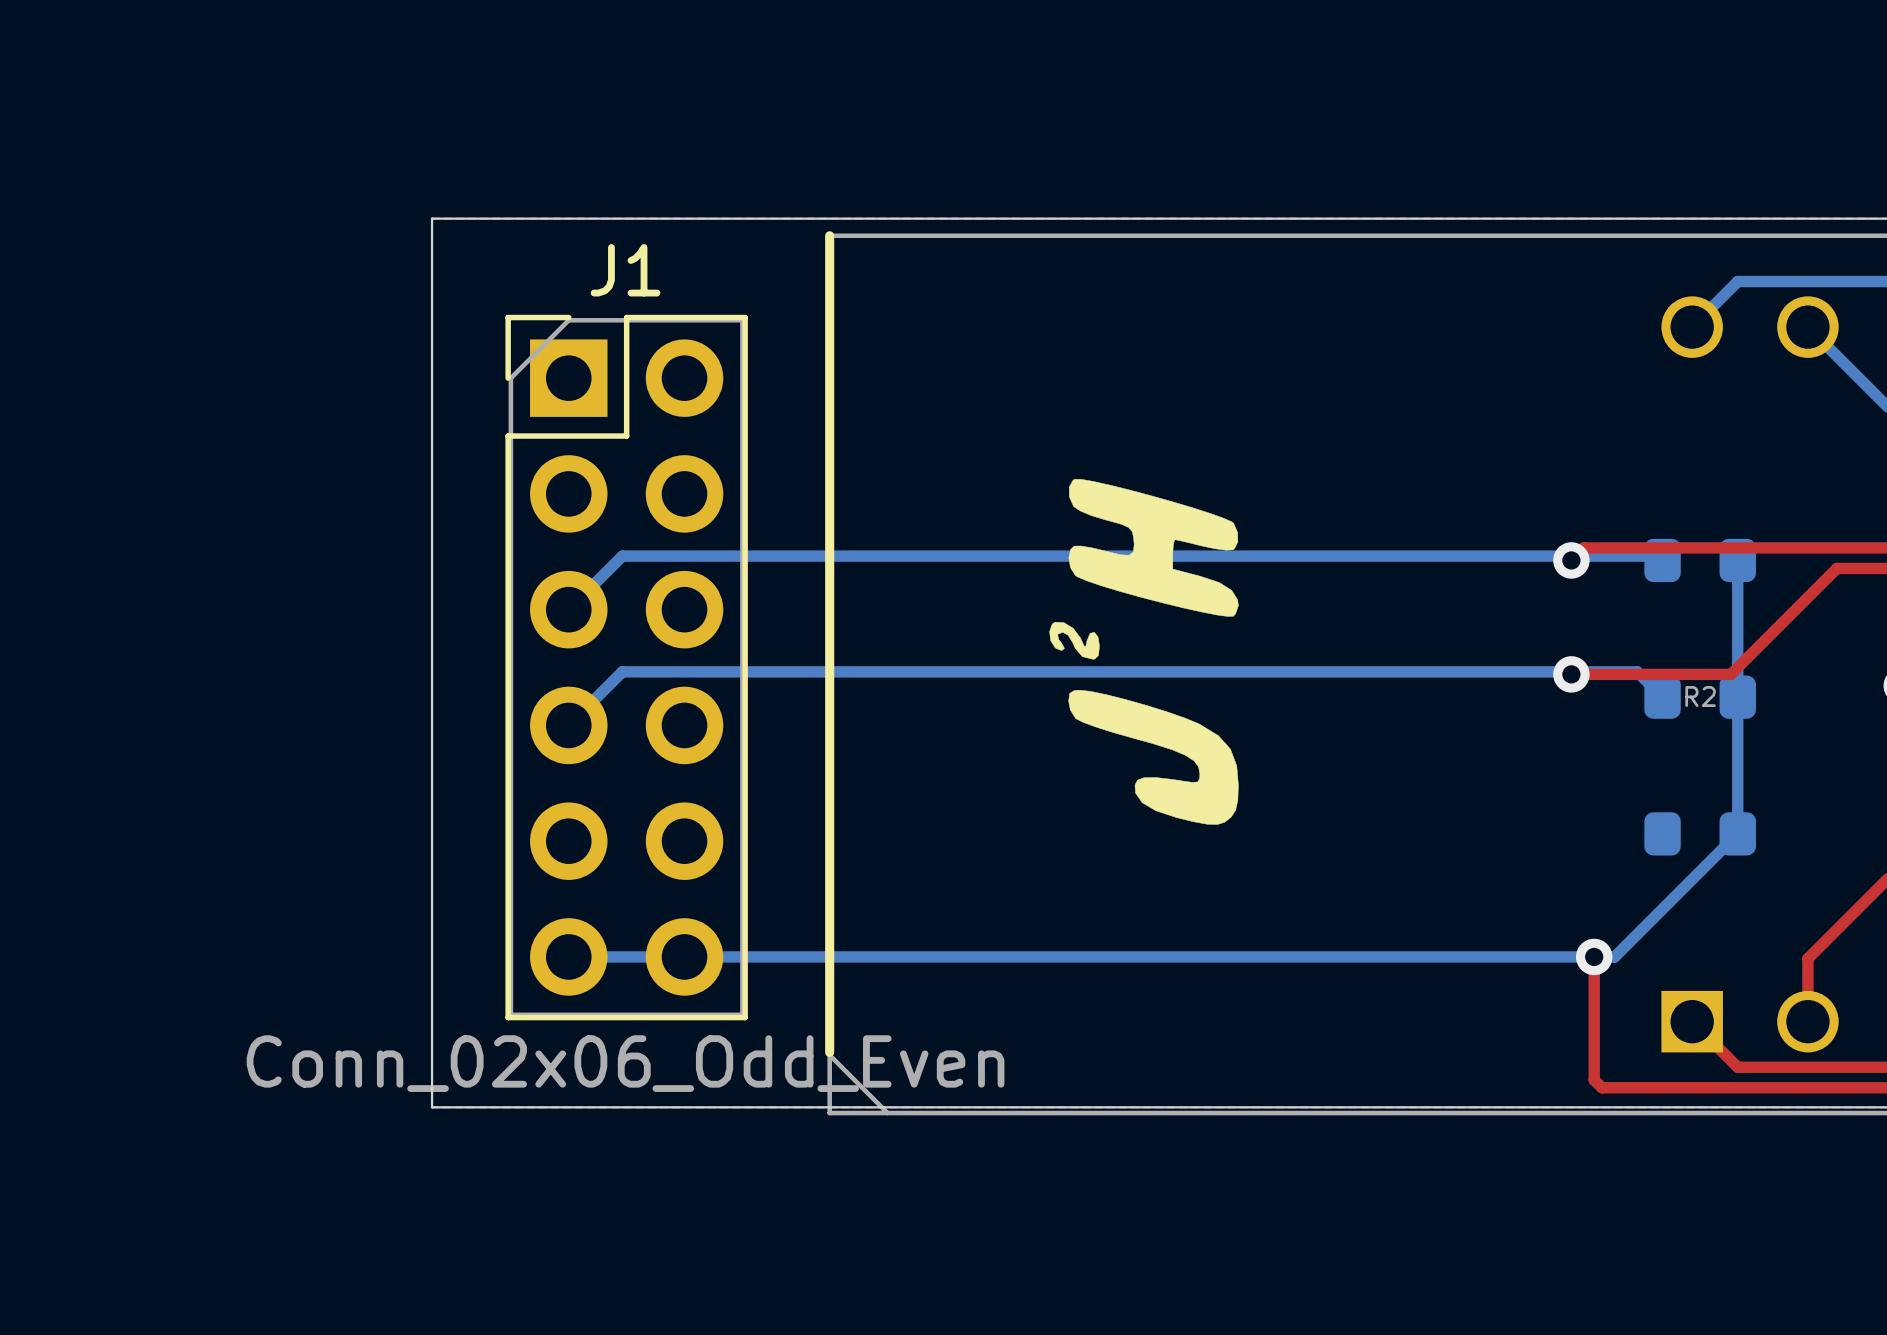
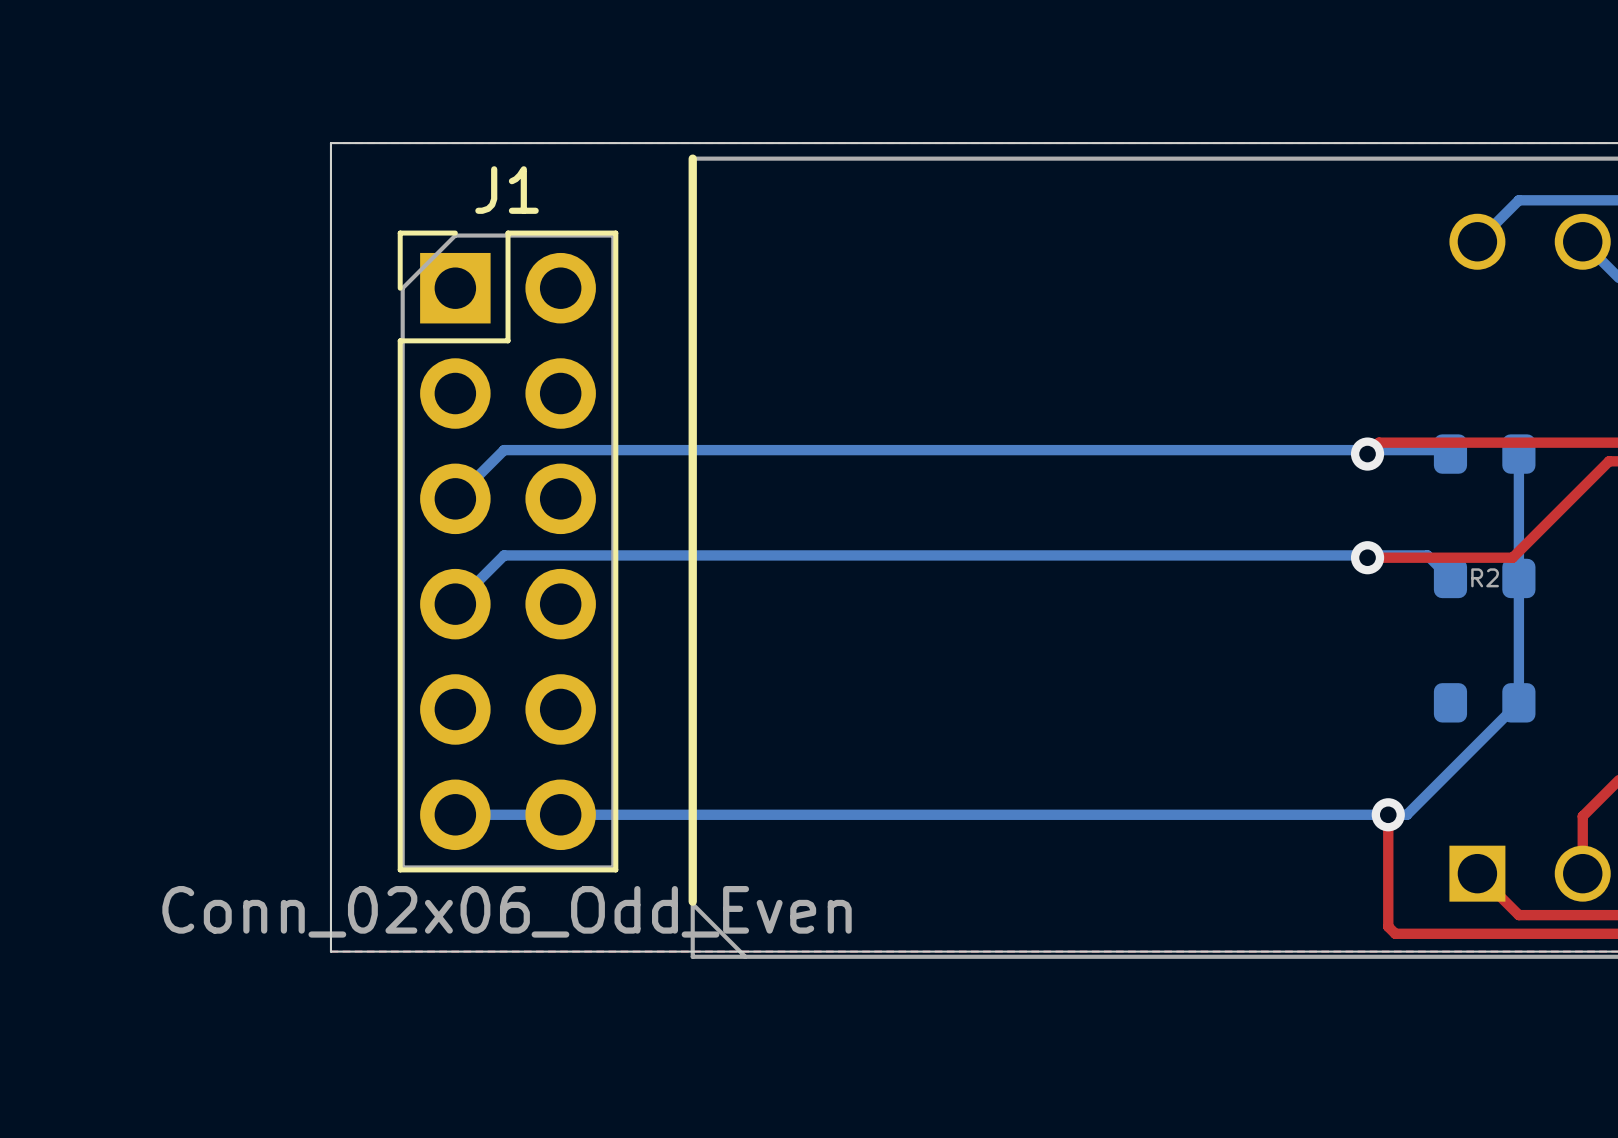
drawing: [1049, 478, 1239, 825] -> none

